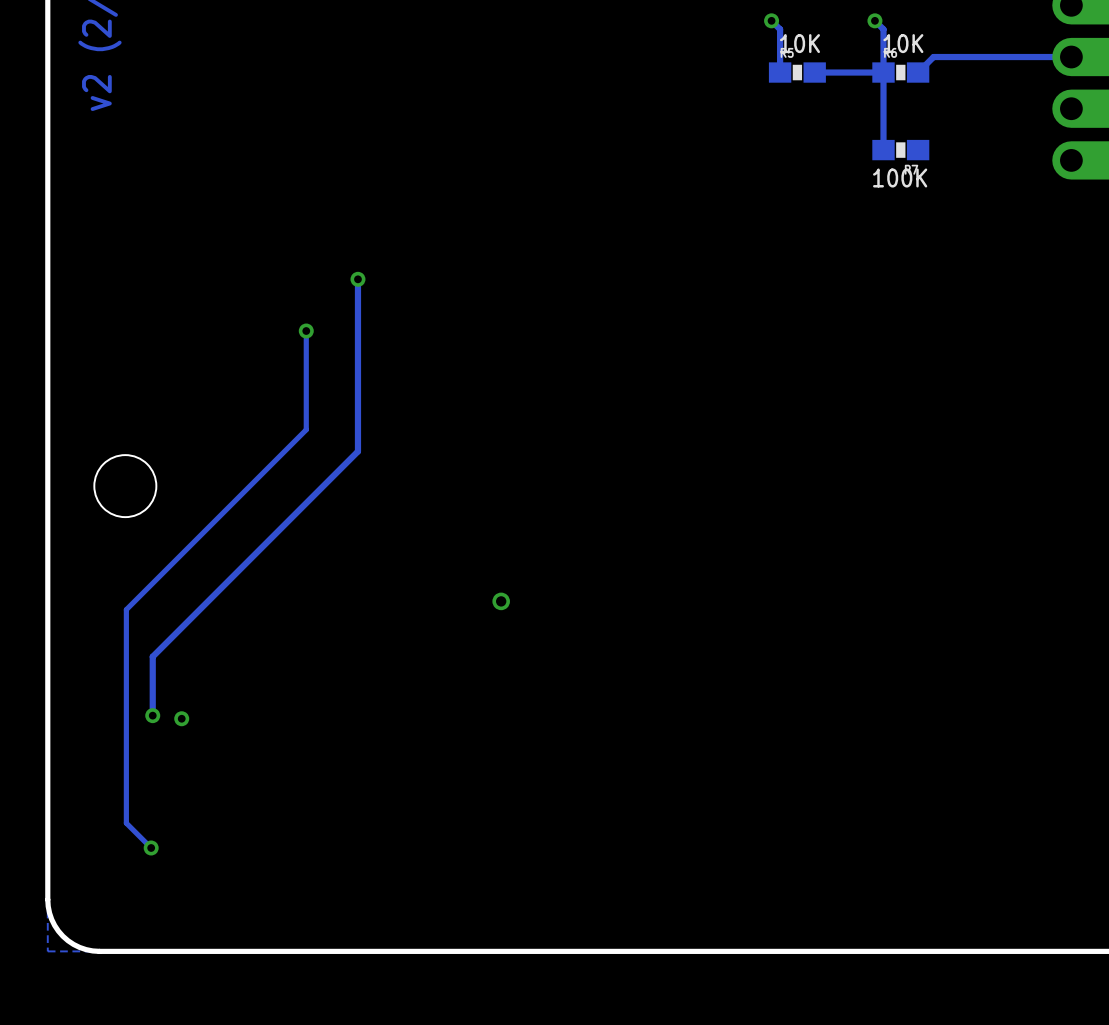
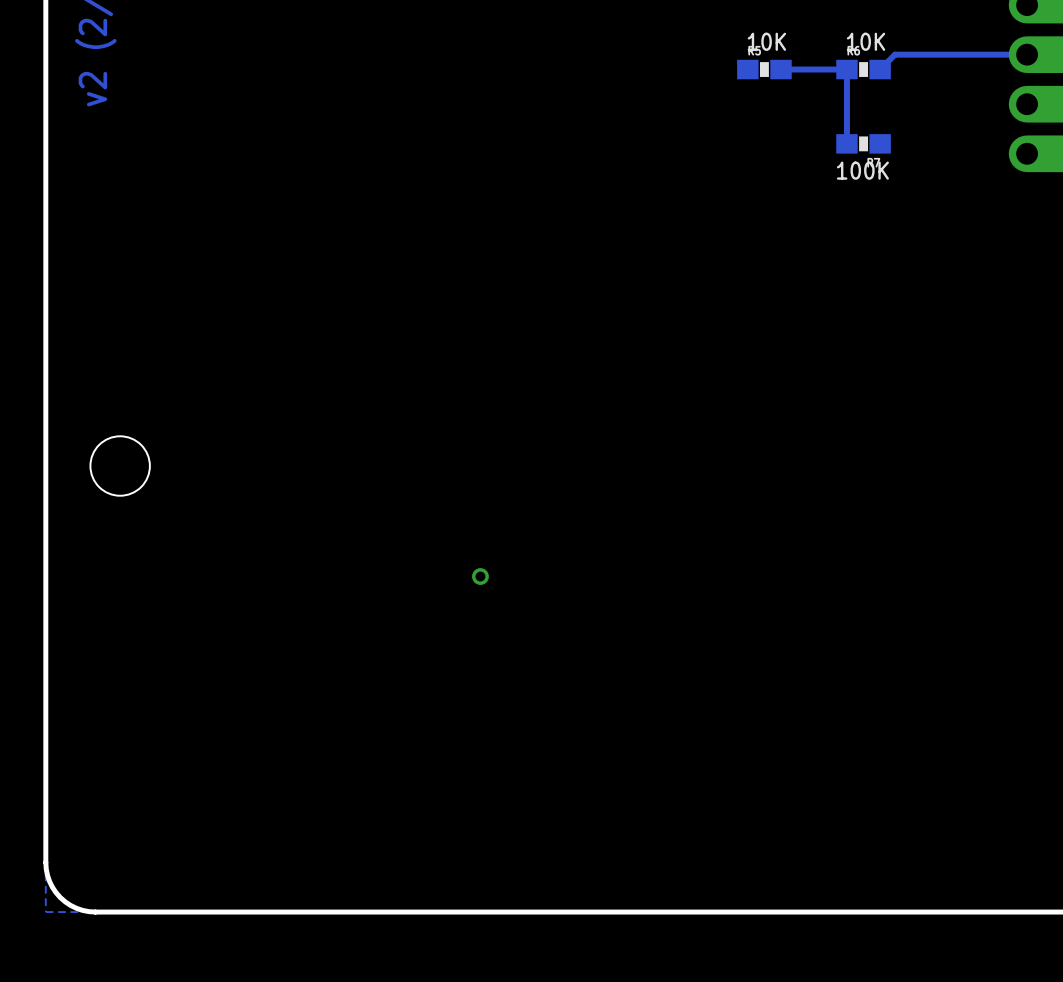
track: (771, 20) (780, 29) (780, 72) -> none
via: (771, 20) -> none
track: (874, 20) (883, 29) (883, 72) -> none
via: (874, 20) -> none
track: (357, 279) (357, 451) (152, 656) (152, 715) -> none
via: (357, 279) -> none
track: (306, 331) (306, 429) (126, 609) (126, 823) (151, 847) -> none
via: (306, 331) -> none
via: (152, 715) -> none
via: (181, 718) -> none
via: (151, 847) -> none

